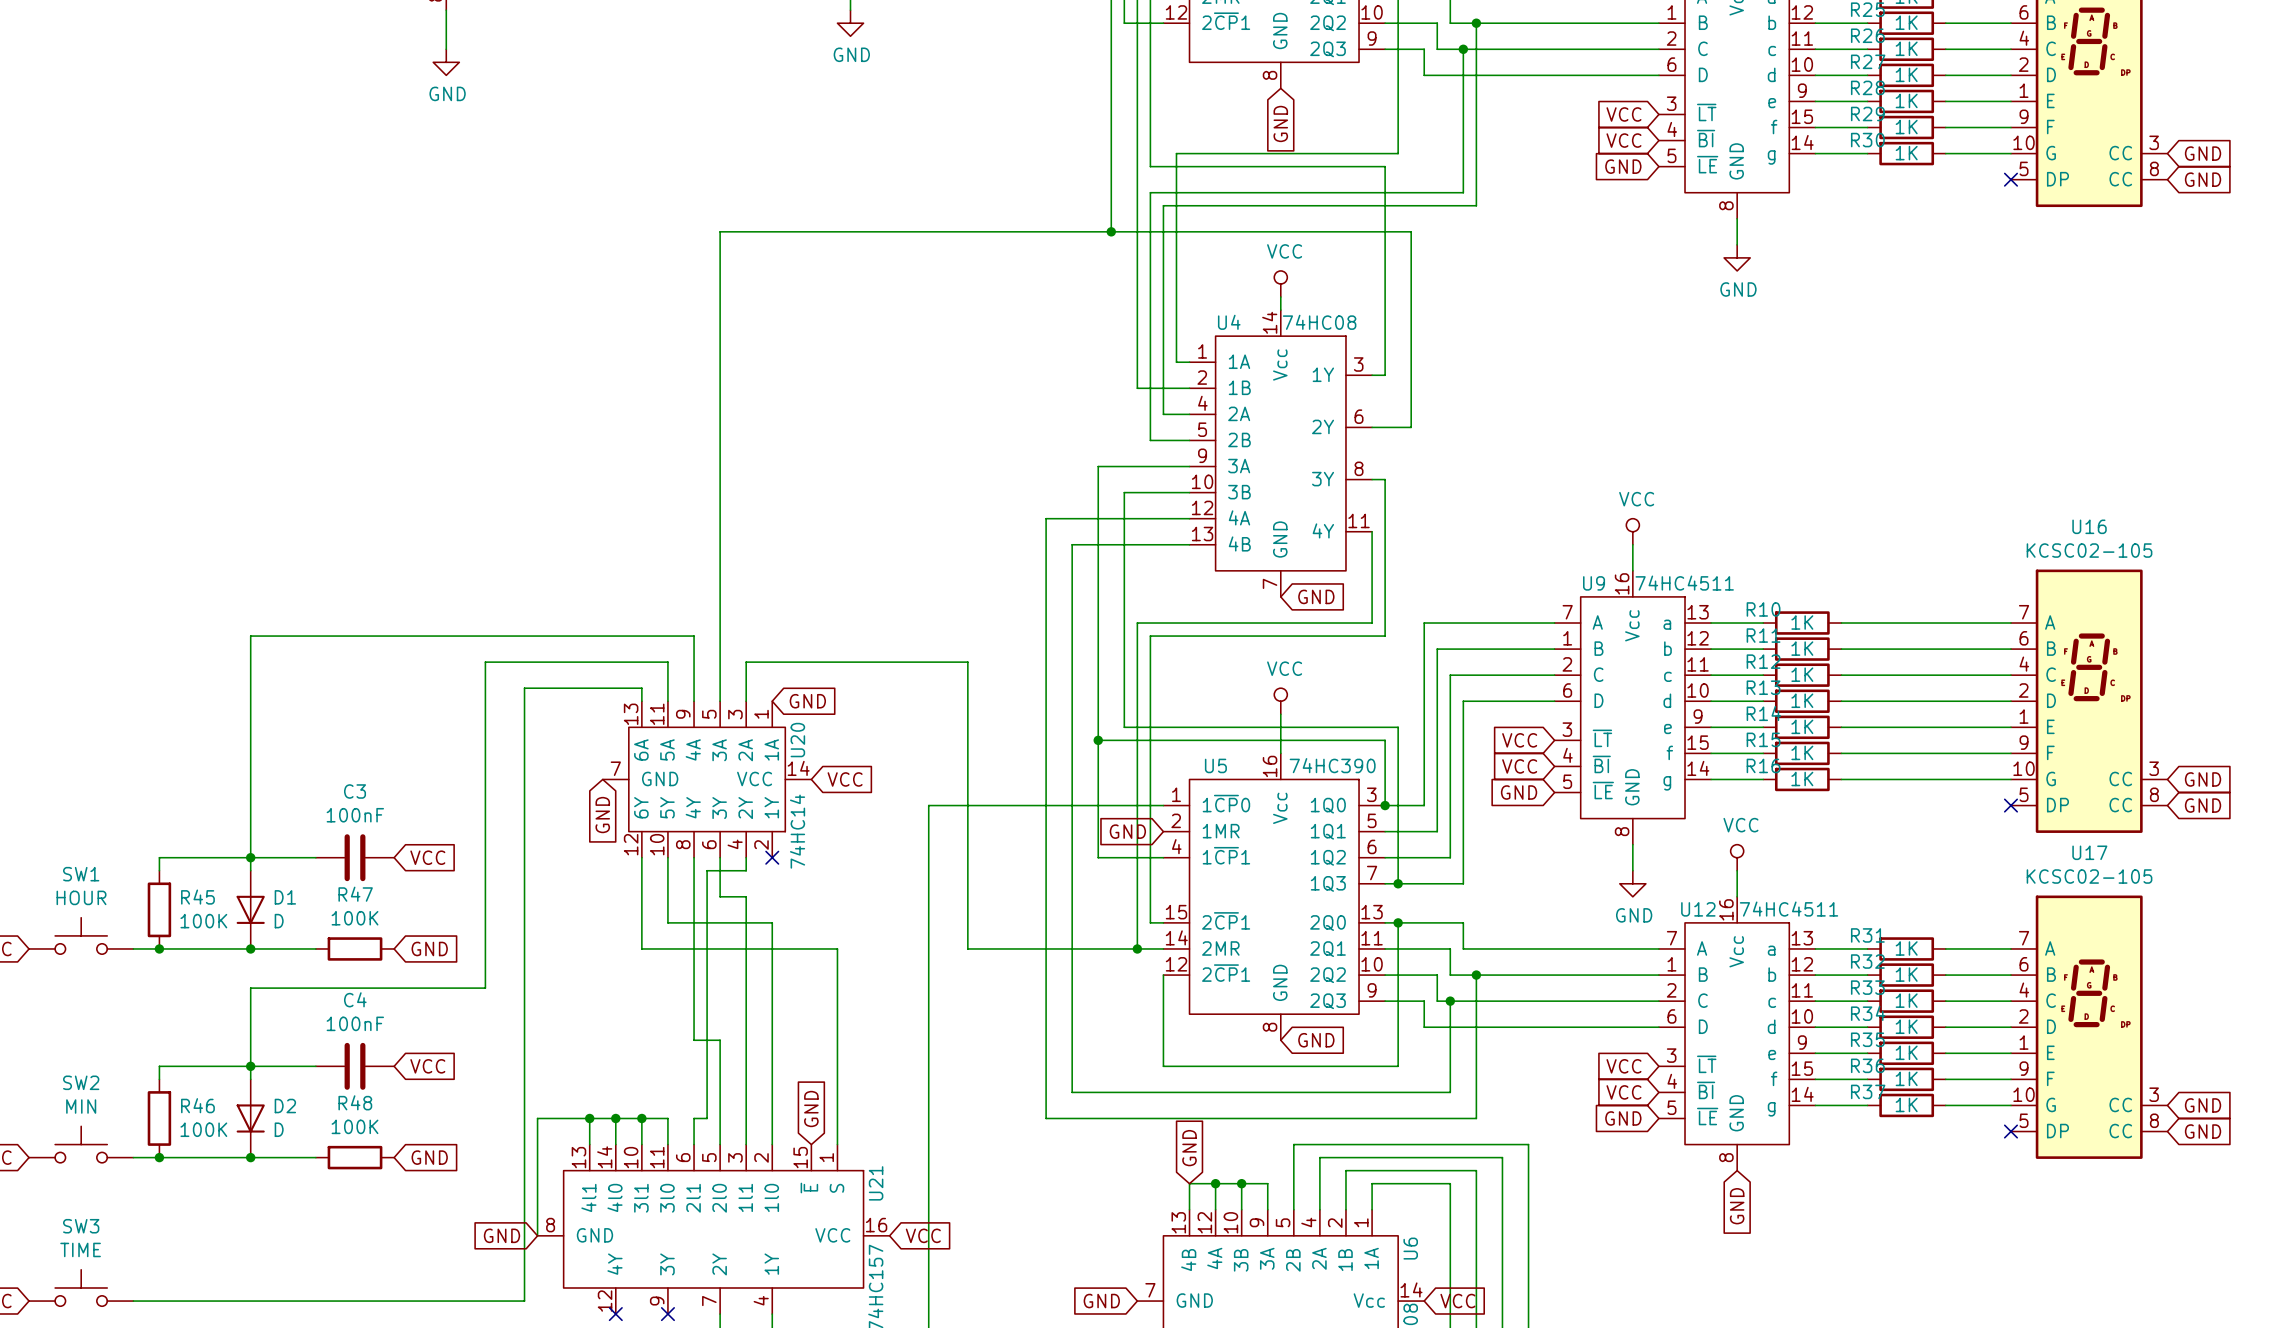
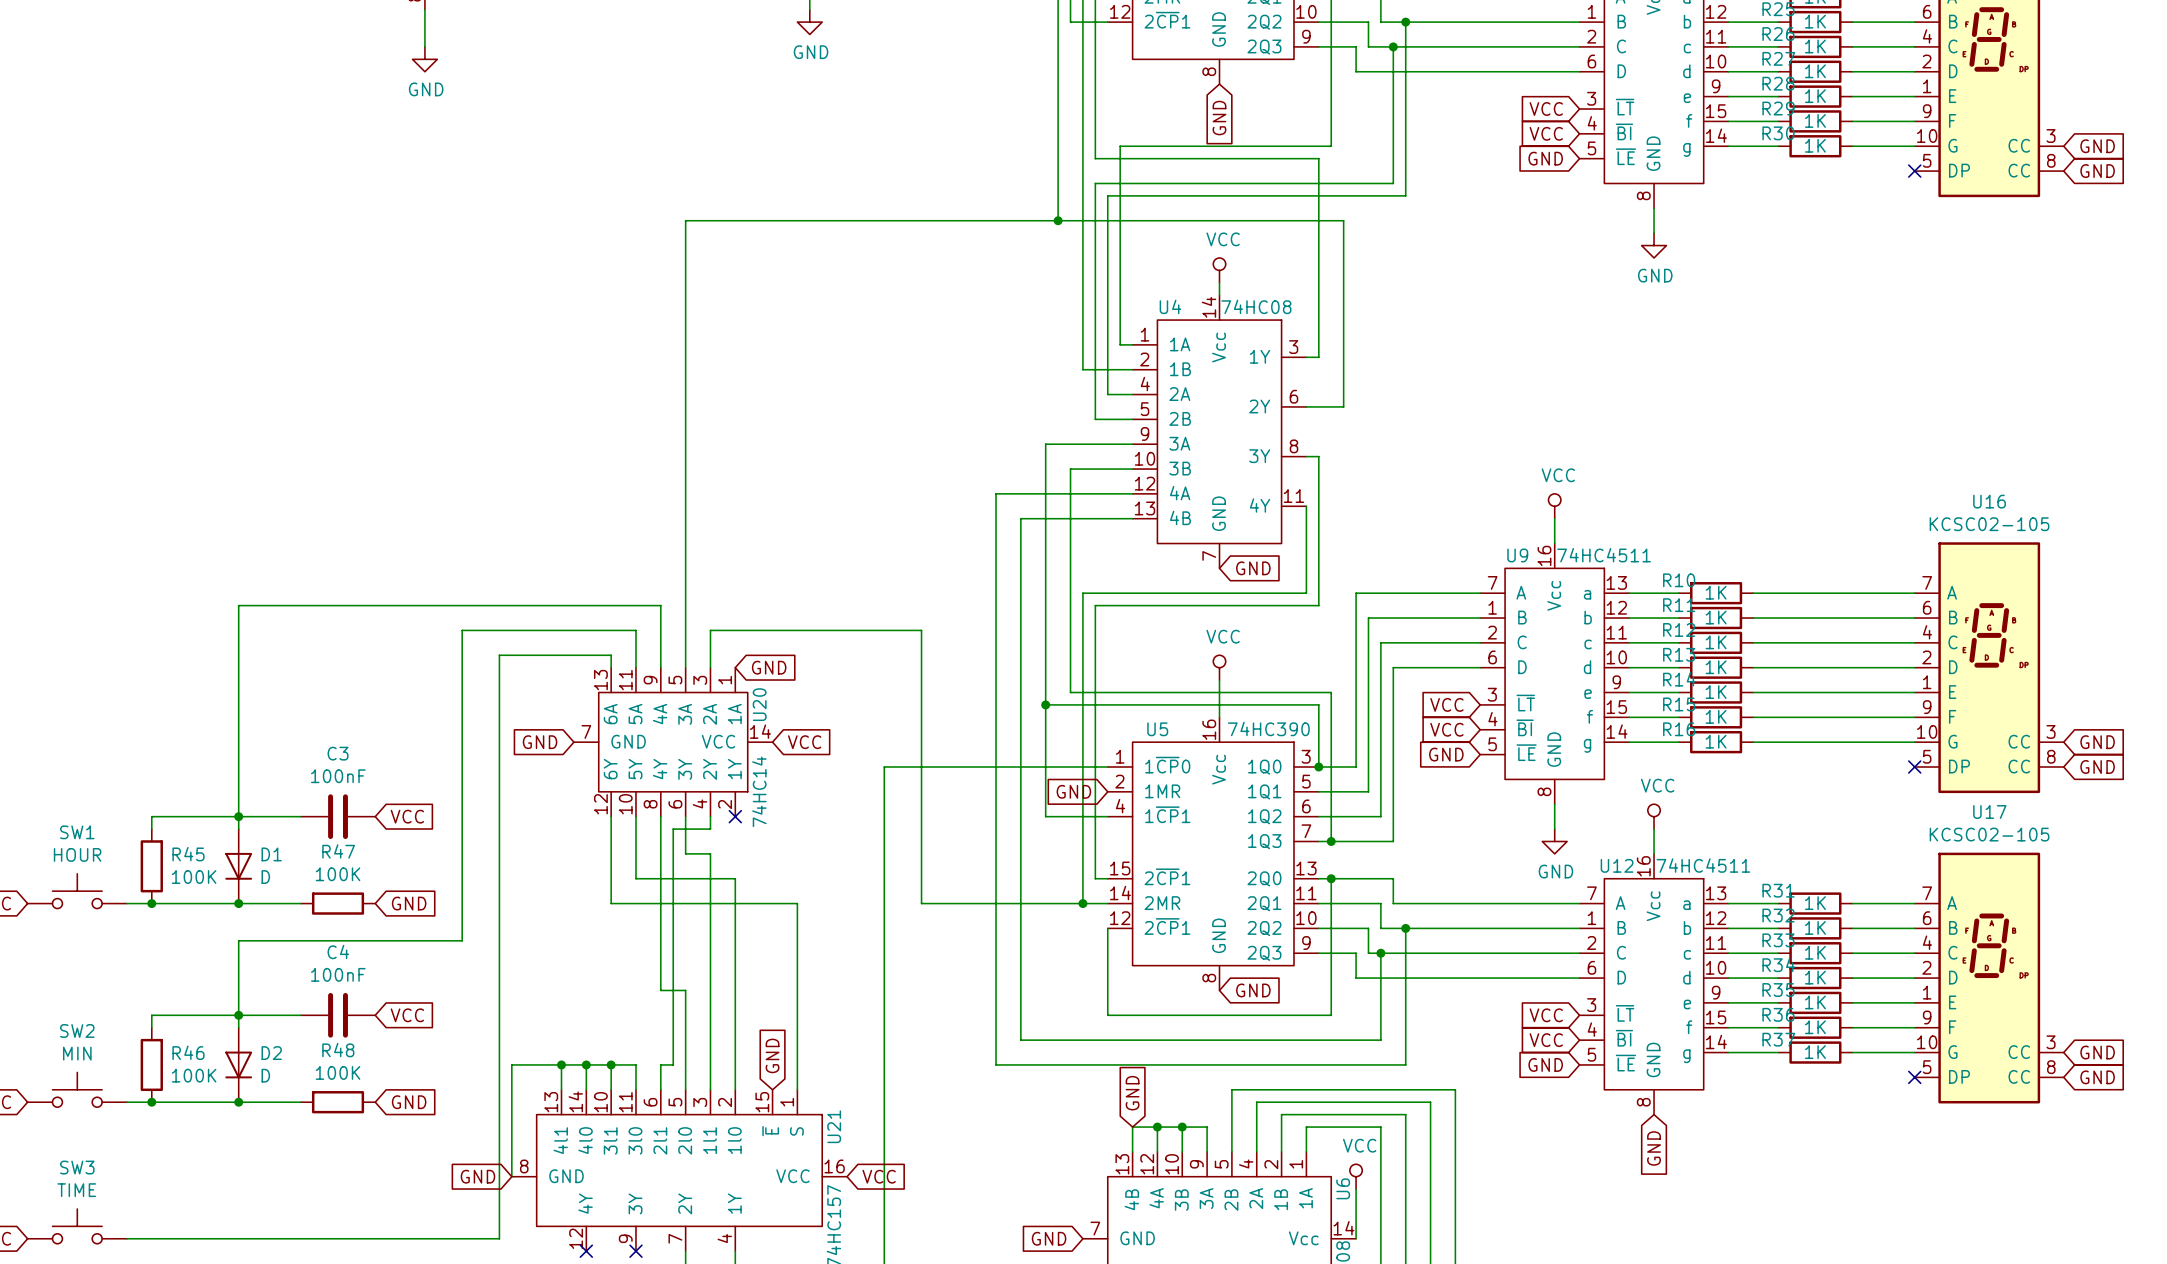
global label rotation: 0° (602, 815) -> 90° clockwise (540, 742)
power symbol: none -> VCC (1356, 1176)
wire: none -> (1356, 1189) (1356, 1238)
global label: VCC (1457, 1301) -> none

